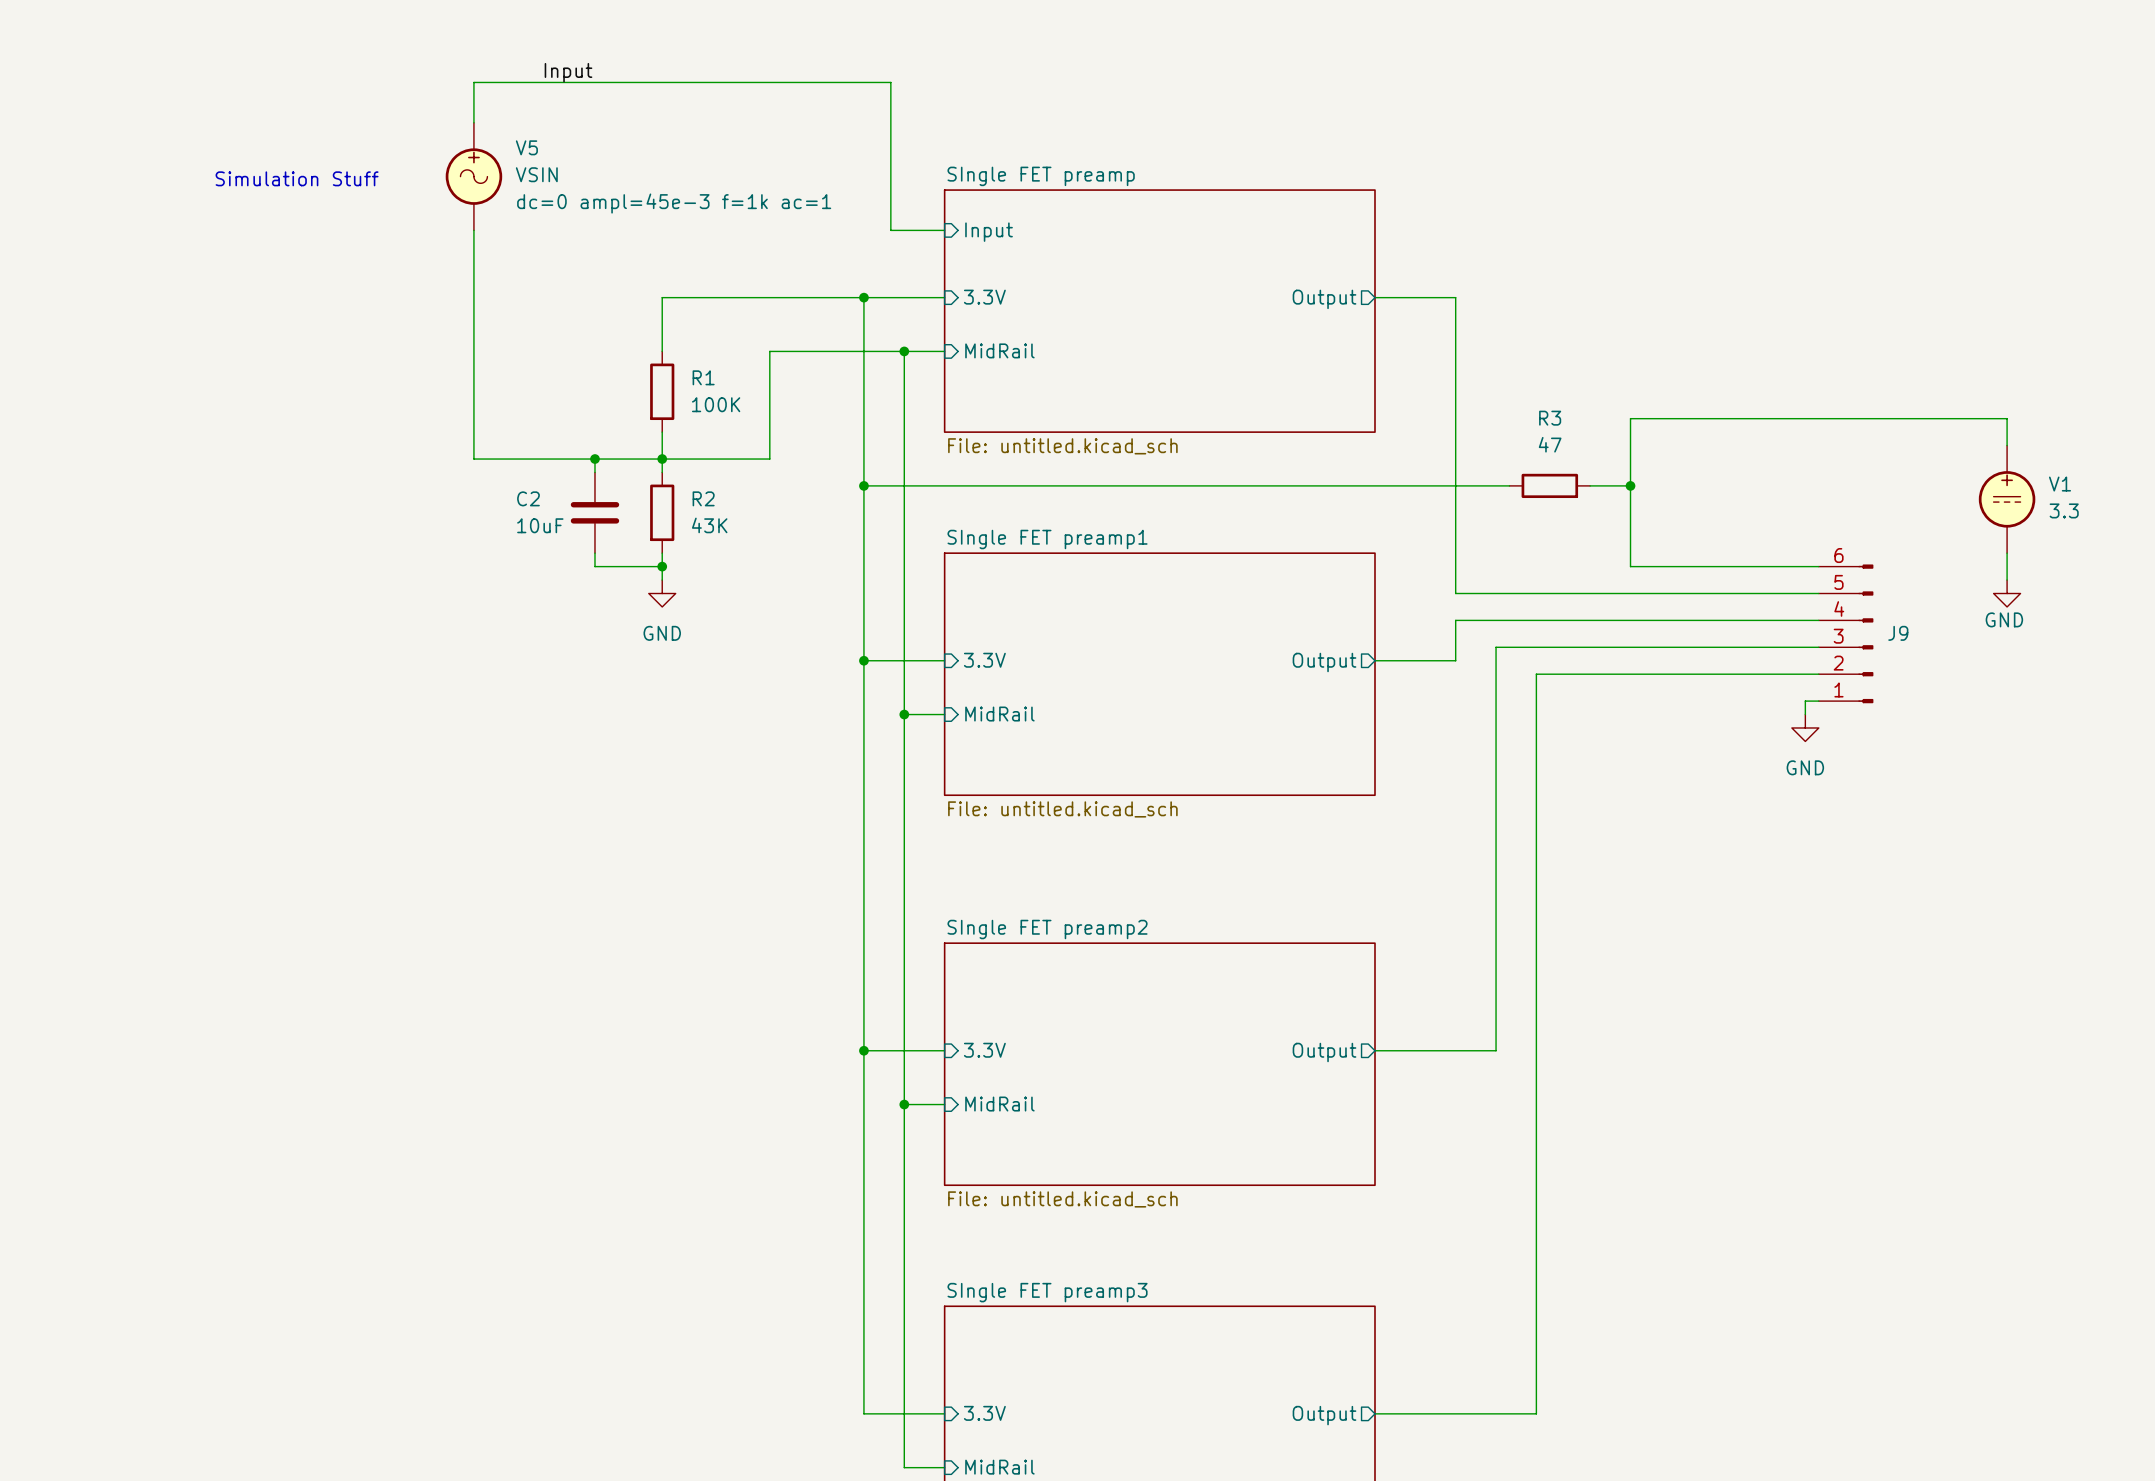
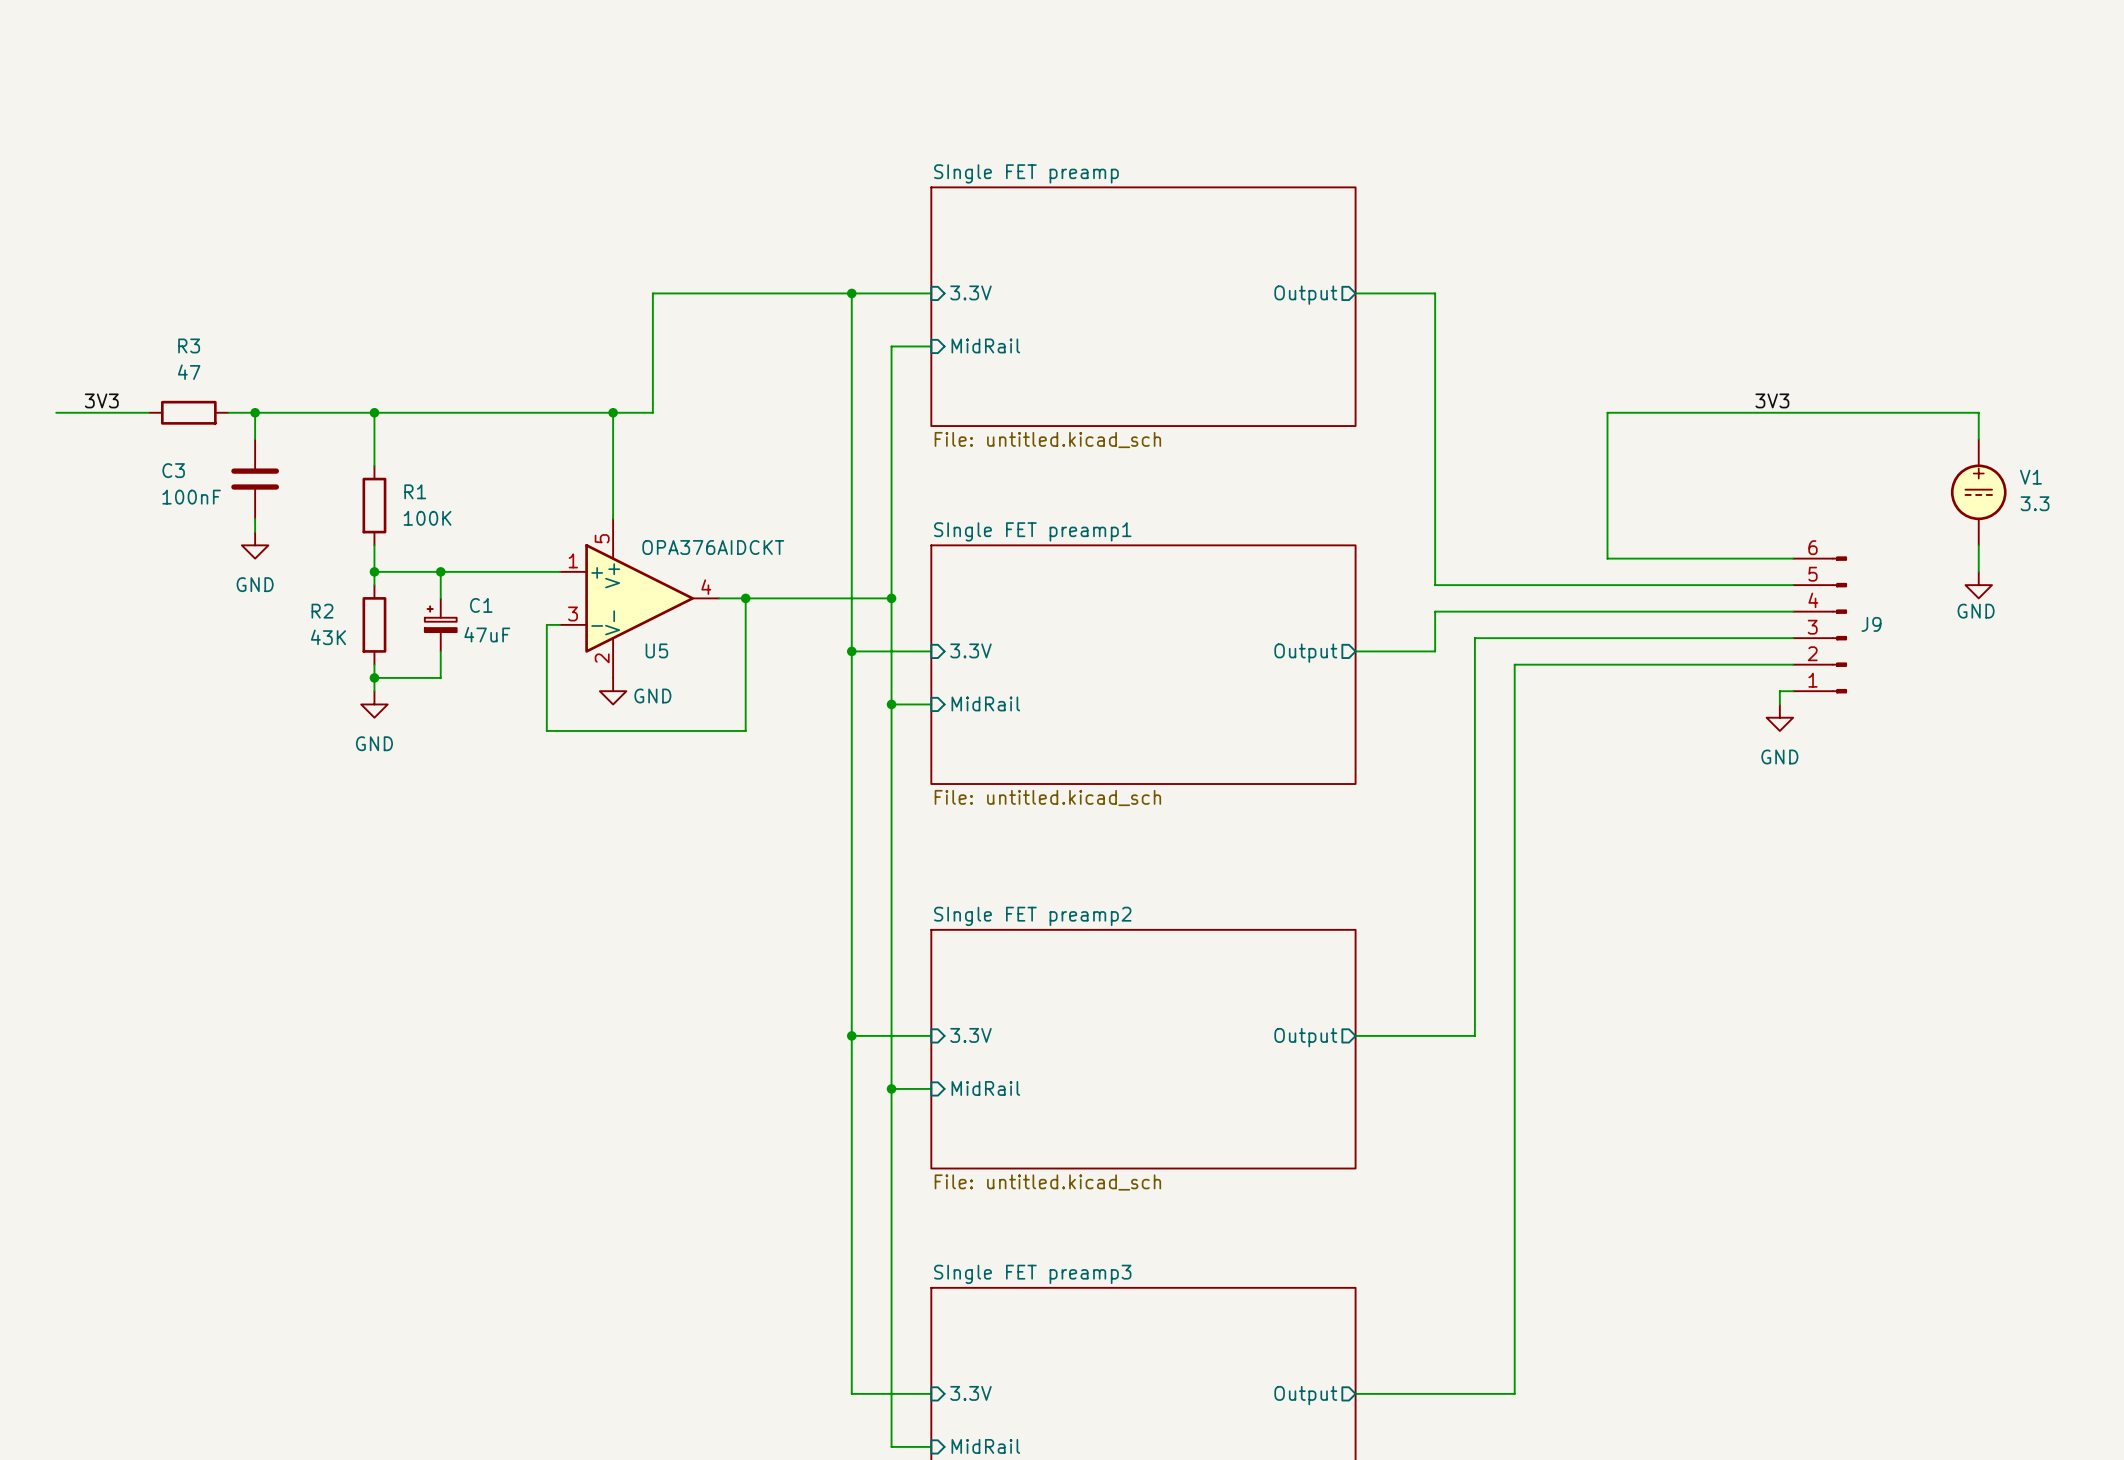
label: Input (568, 72) -> none
wire: (473, 122) (473, 82) (890, 82) (890, 230) (944, 230) -> none
V5: VSIN (473, 176) -> none
text: Simulation Stuff (297, 178) -> none
wire: (473, 230) (473, 459) (769, 459) (769, 351) (904, 351) -> none
sheet pin: Input (989, 232) -> none
wire: none -> (652, 346) (652, 412) (228, 412)
junction: (904, 351) -> none
R1 position: (662, 391) -> (374, 505)
label: none -> 3V3 (101, 400)
label: none -> 3V3 (1772, 400)
wire: none -> (56, 412) (149, 412)
wire: none -> (255, 412) (255, 439)
junction: none -> (255, 412)
wire: none -> (374, 412) (374, 465)
junction: none -> (374, 412)
wire: none -> (613, 412) (613, 518)
junction: none -> (613, 412)
wire: (662, 432) (662, 472) -> none
wire: (594, 459) (594, 472) -> none
junction: (594, 459) -> none
junction: (662, 459) -> none
C3: none -> 100nF (255, 479)
wire: (863, 485) (1509, 485) -> none
junction: (863, 485) -> none
R3 position: (1549, 485) -> (188, 412)
wire: (1590, 485) (1630, 485) -> none
junction: (1630, 485) -> none
R2 name position: R2 (703, 498) -> R2 (322, 611)
C2: 10uF (594, 512) -> none
R2 position: (662, 512) -> (374, 624)
R2 value position: 43K (709, 525) -> 43K (328, 637)
wire: none -> (255, 518) (255, 532)
power symbol: none -> GND (255, 545)
wire: none -> (374, 545) (374, 585)
wire: (594, 553) (594, 566) (662, 566) -> none
wire: (662, 553) (662, 580) -> (440, 571) (440, 598)
junction: (662, 566) -> none
wire: none -> (374, 571) (560, 571)
junction: none -> (374, 571)
junction: none -> (440, 571)
power symbol position: GND (662, 593) -> GND (613, 691)
U5: none -> OPA376AIDCKT (639, 598)
wire: none -> (719, 598) (891, 598)
wire: none -> (745, 598) (745, 730) (546, 730) (546, 624) (560, 624)
junction: none -> (745, 598)
junction: none -> (891, 598)
C1: none -> 47uF (440, 624)
power symbol text position: GND (662, 633) -> GND (652, 696)
wire: none -> (440, 651) (440, 677) (374, 677)
wire: none -> (374, 664) (374, 691)
junction: none -> (374, 677)
power symbol: none -> GND (374, 704)

